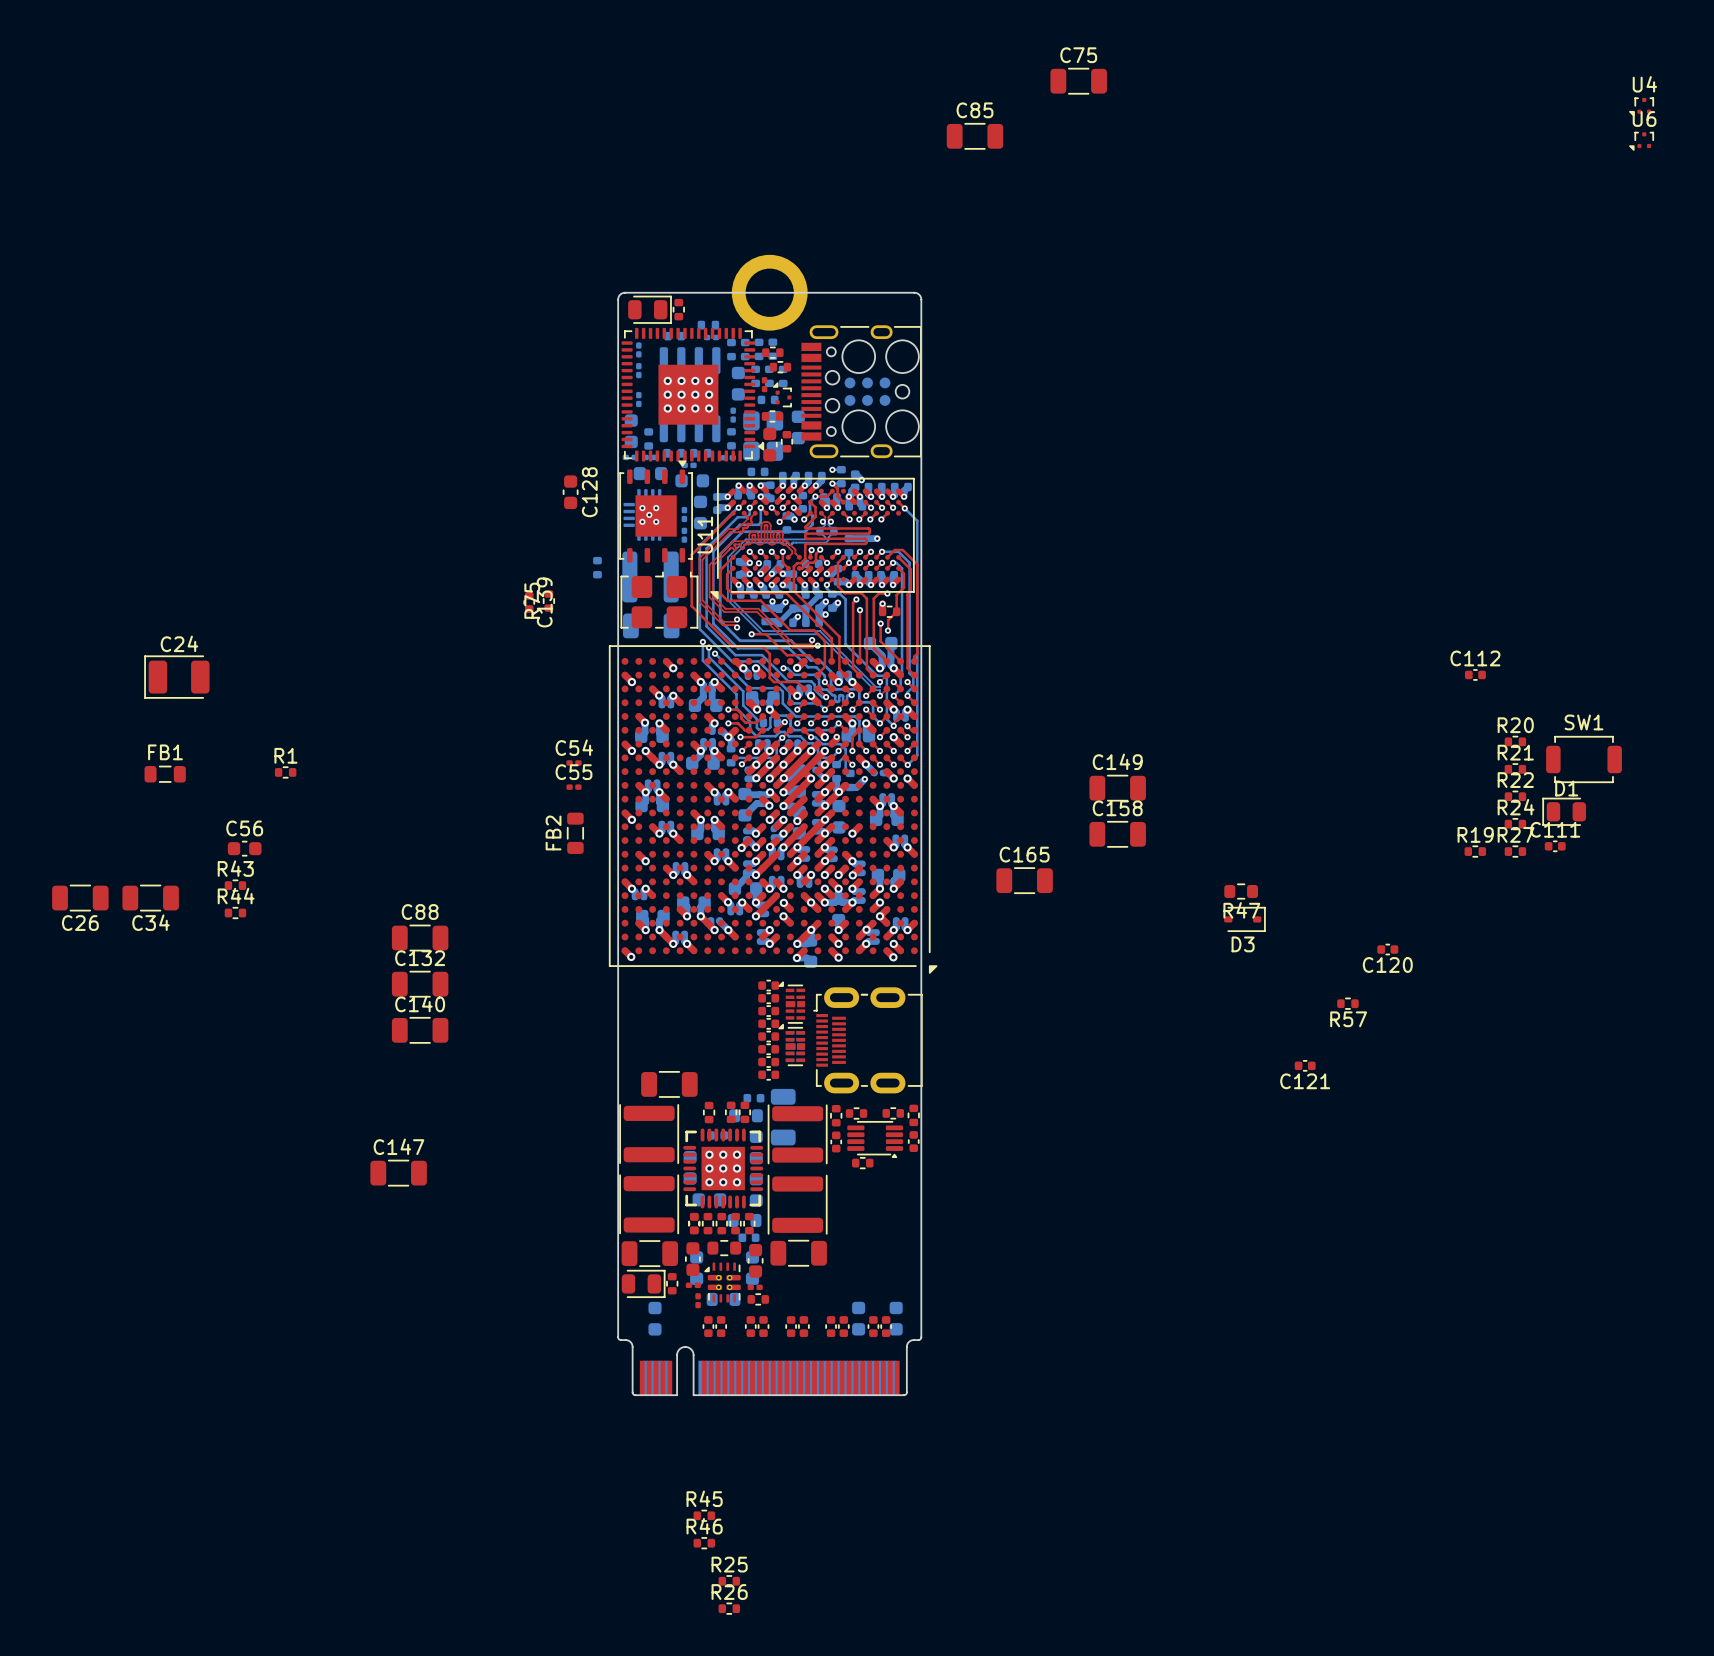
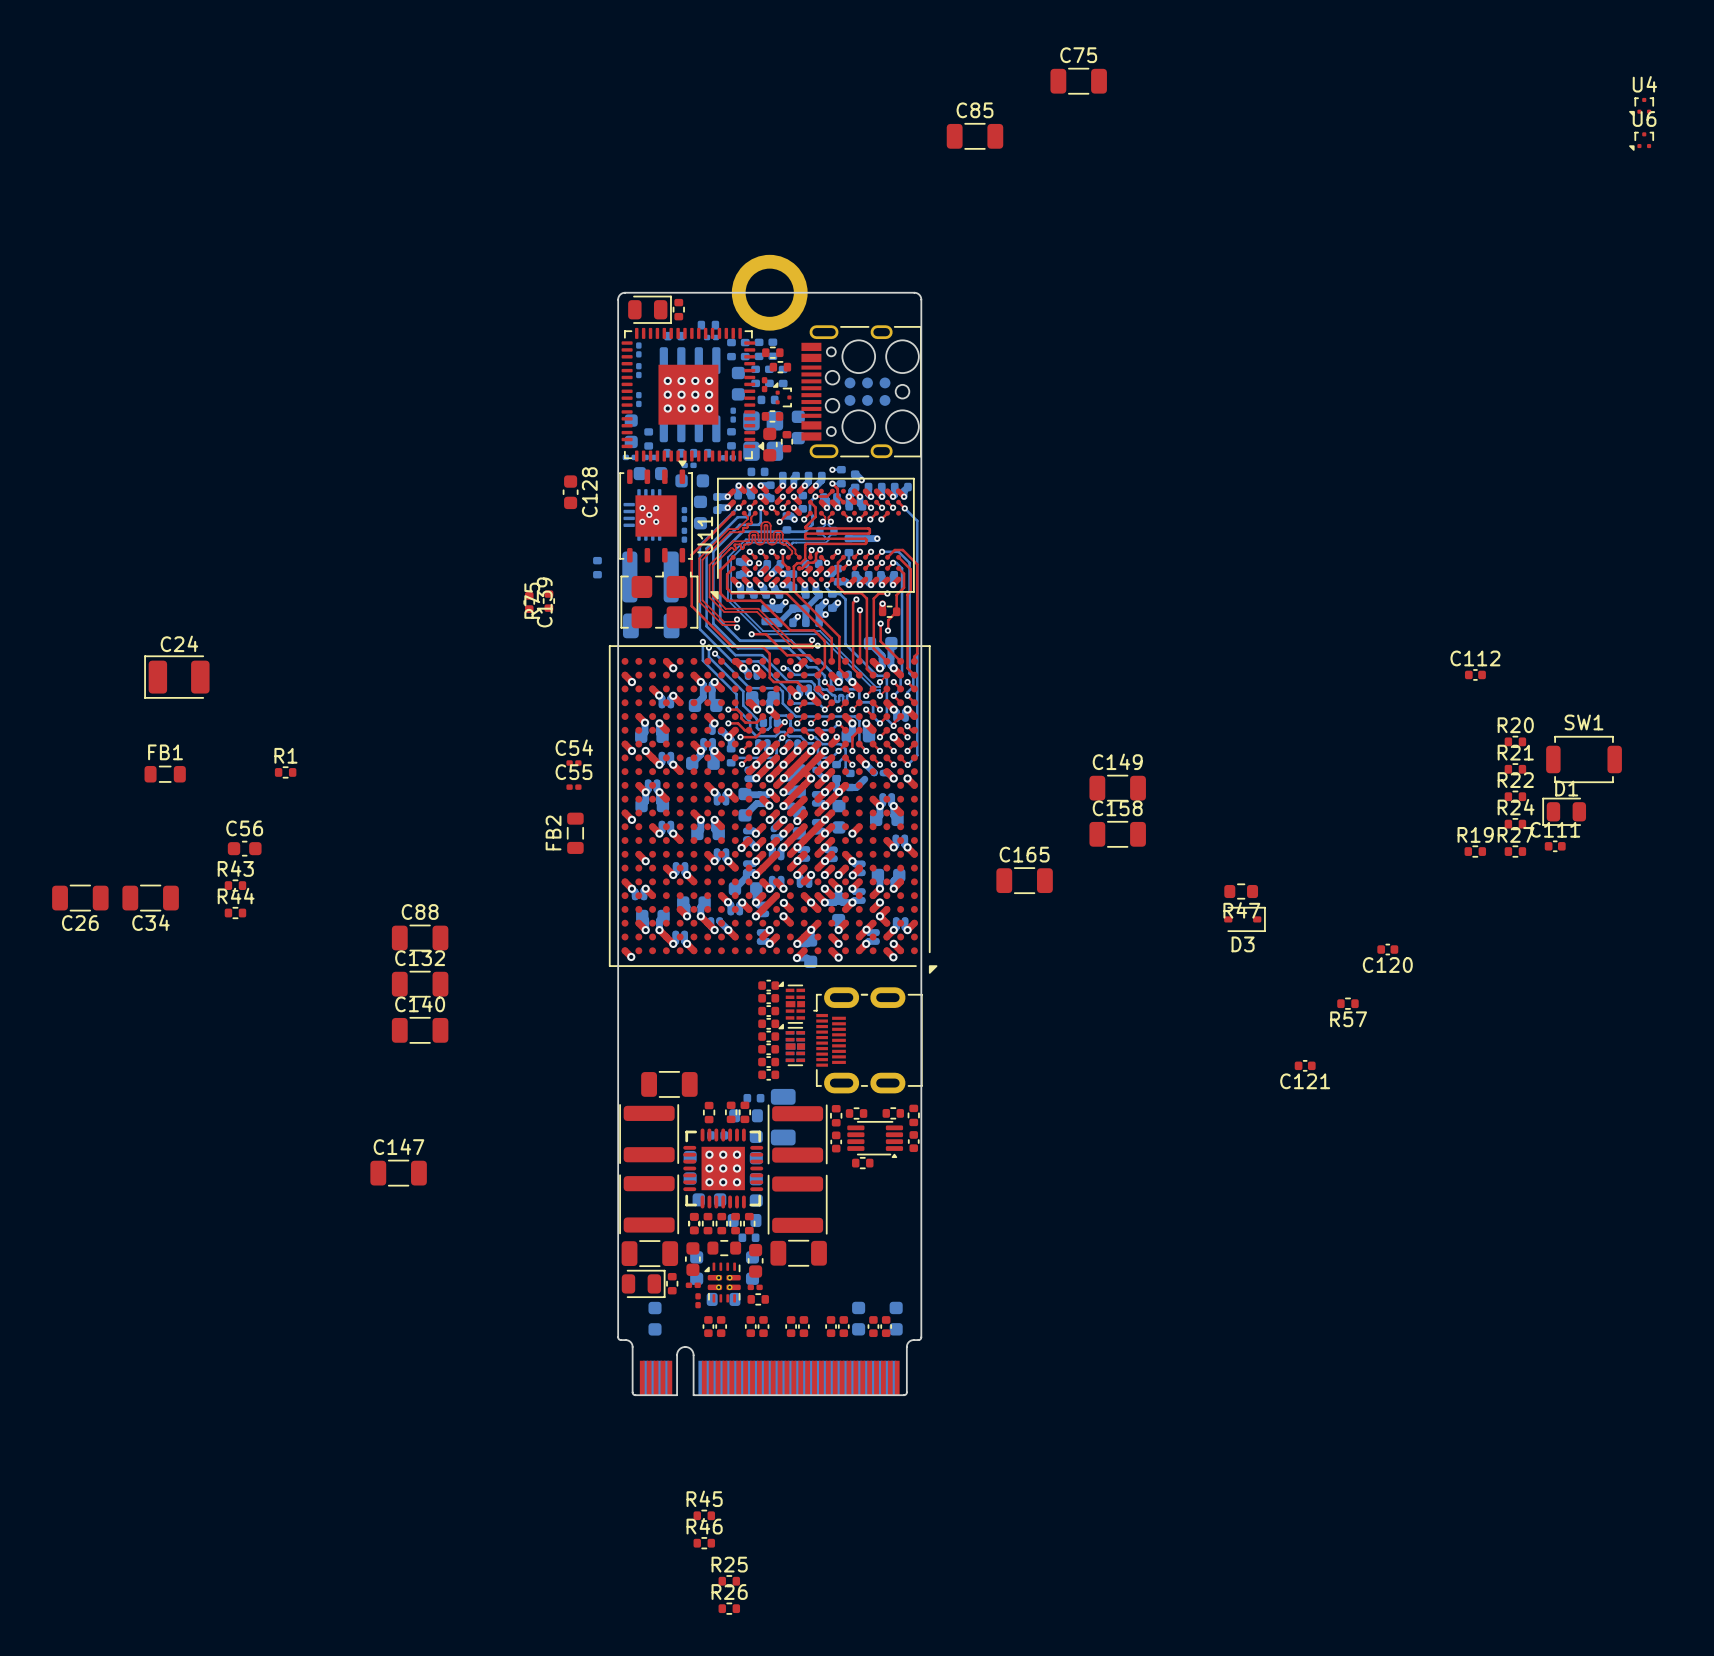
via: (864, 779) -> none

